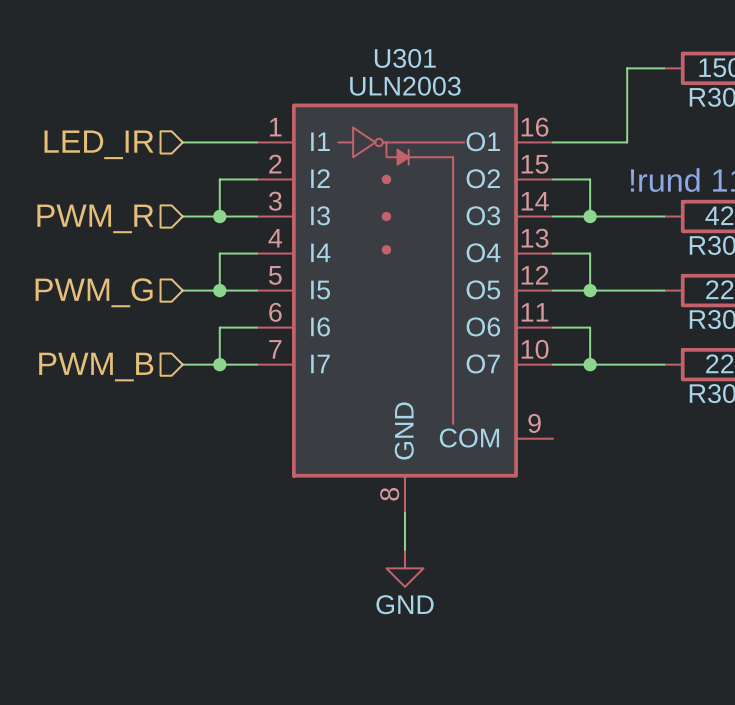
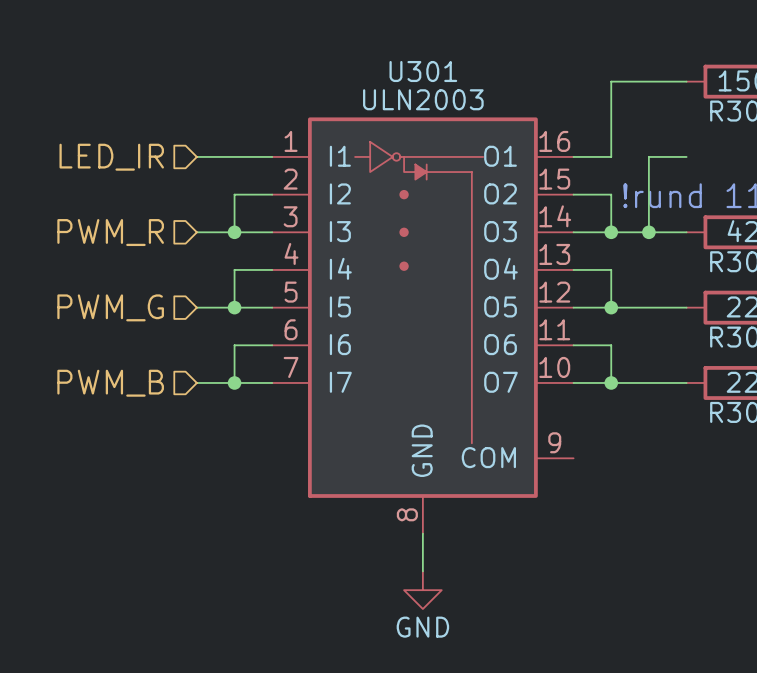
wire: (627, 68) (627, 142) (590, 142) -> (648, 81) (611, 81) (611, 156)
wire: none -> (686, 156) (648, 156) (648, 232)
junction: none -> (648, 232)

